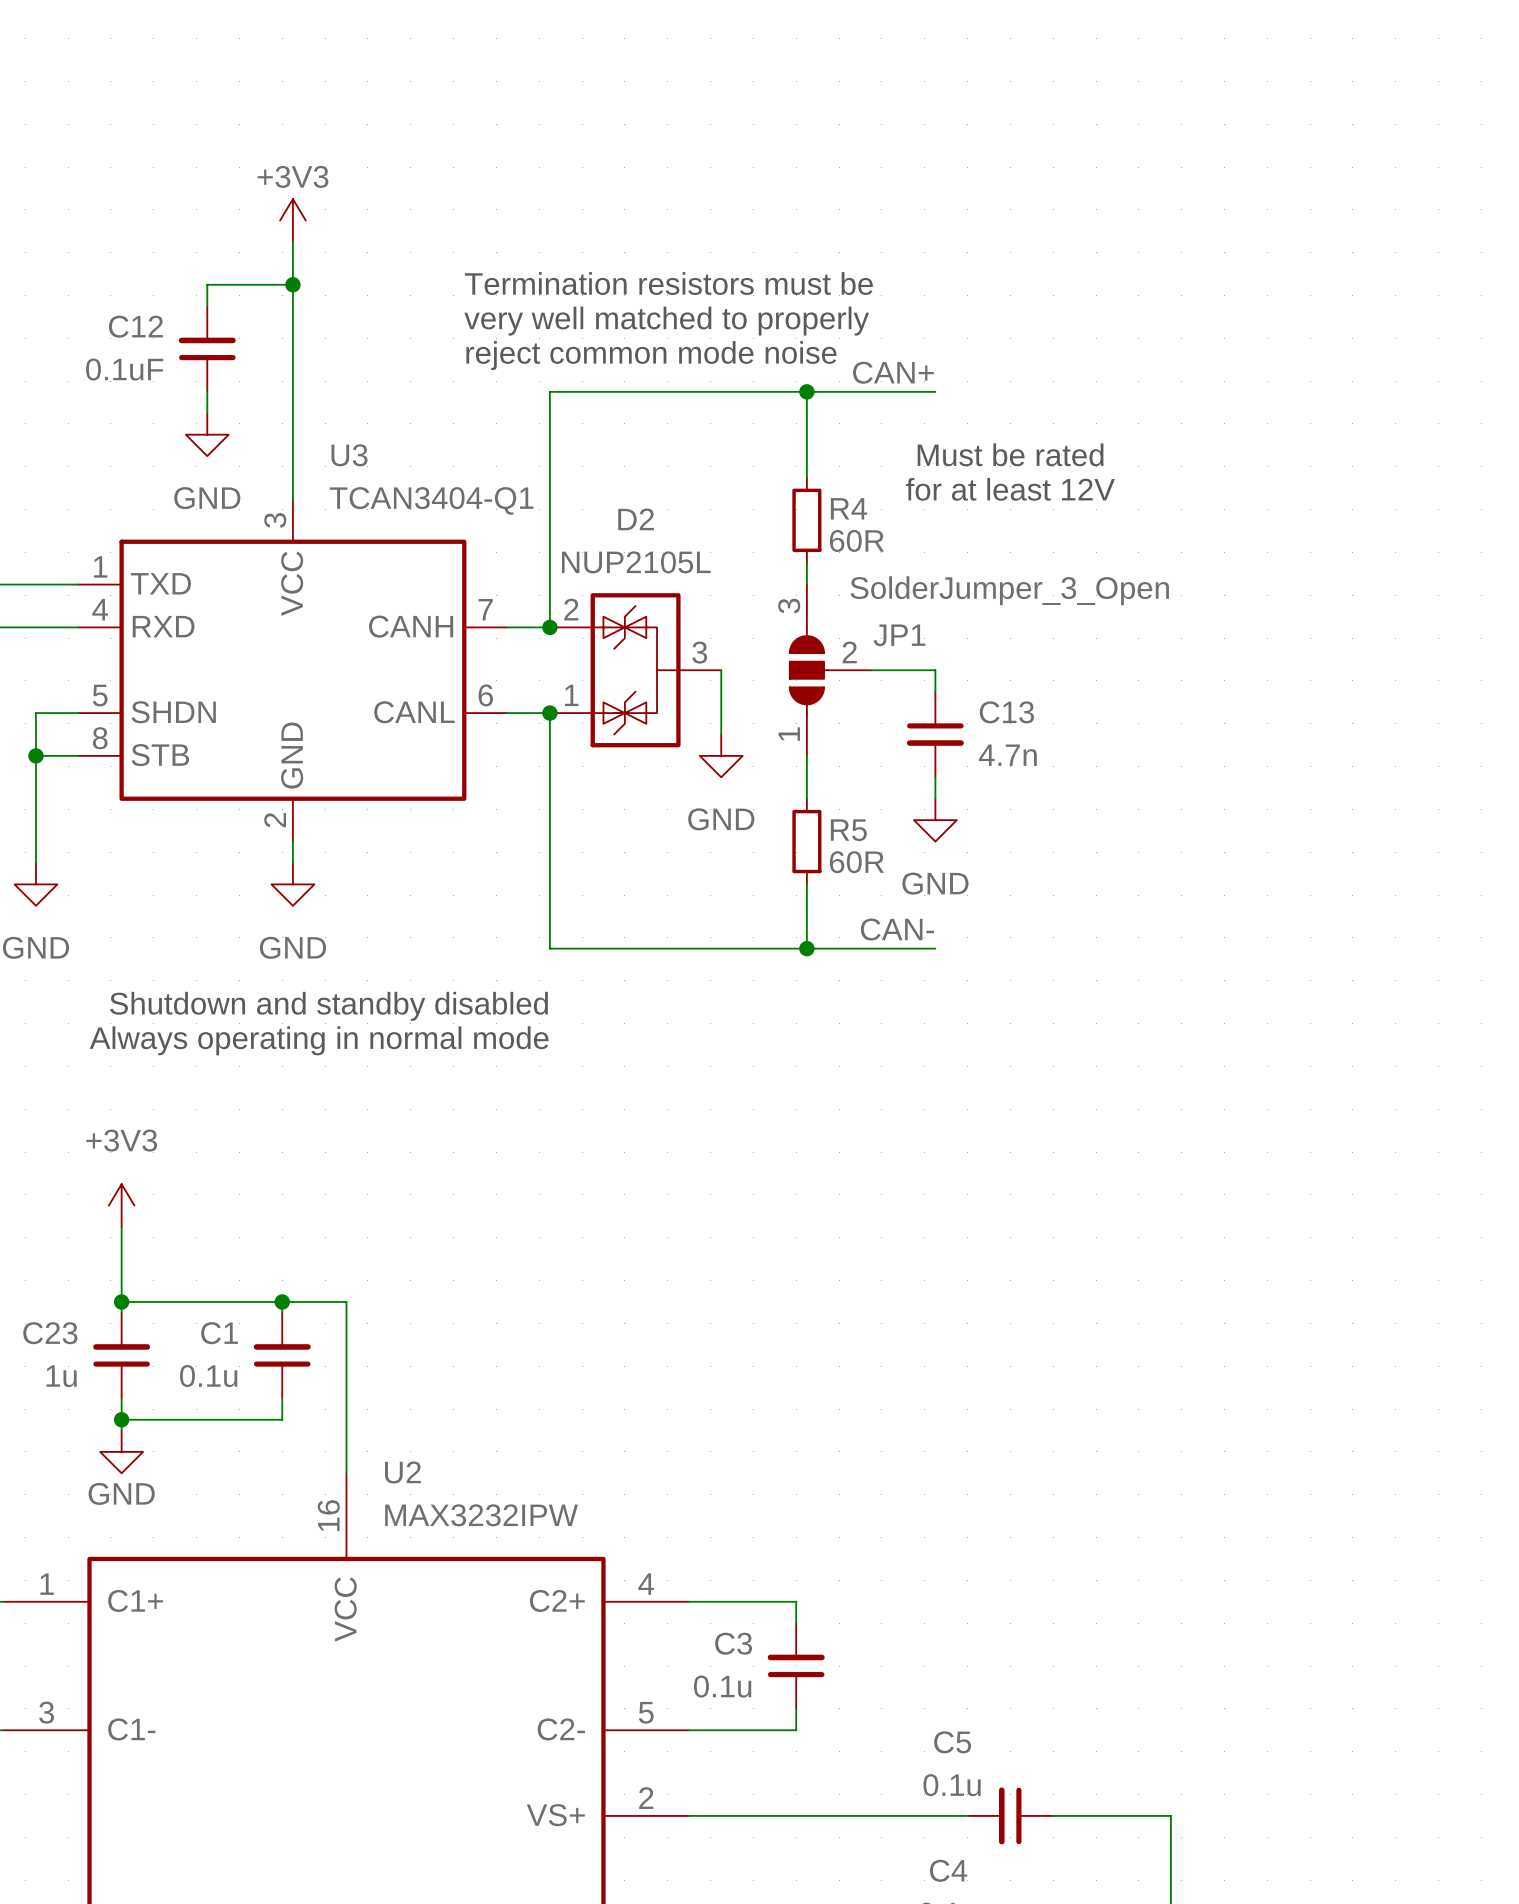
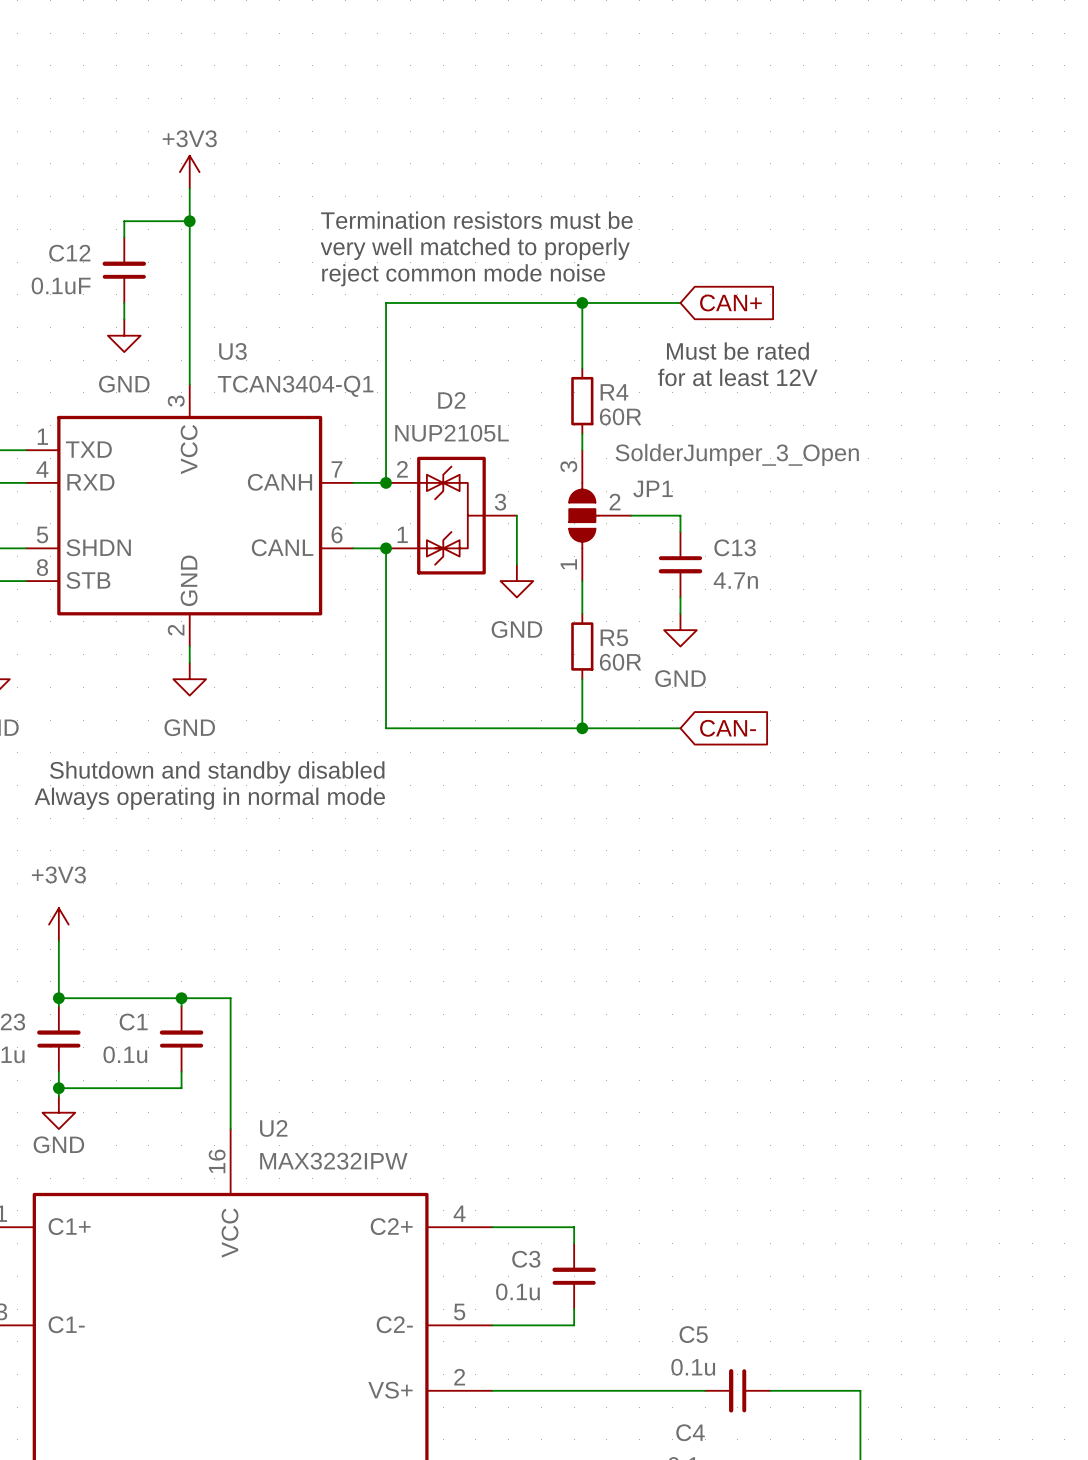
label: CAN+ (893, 372) -> none
global label: none -> CAN+ (730, 302)
label: CAN- (897, 929) -> none
global label: none -> CAN- (728, 728)

